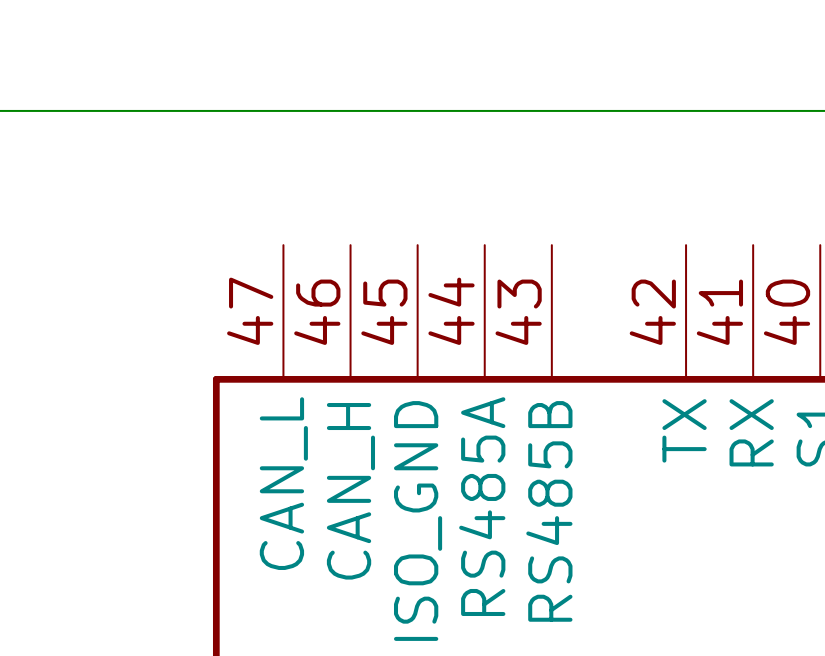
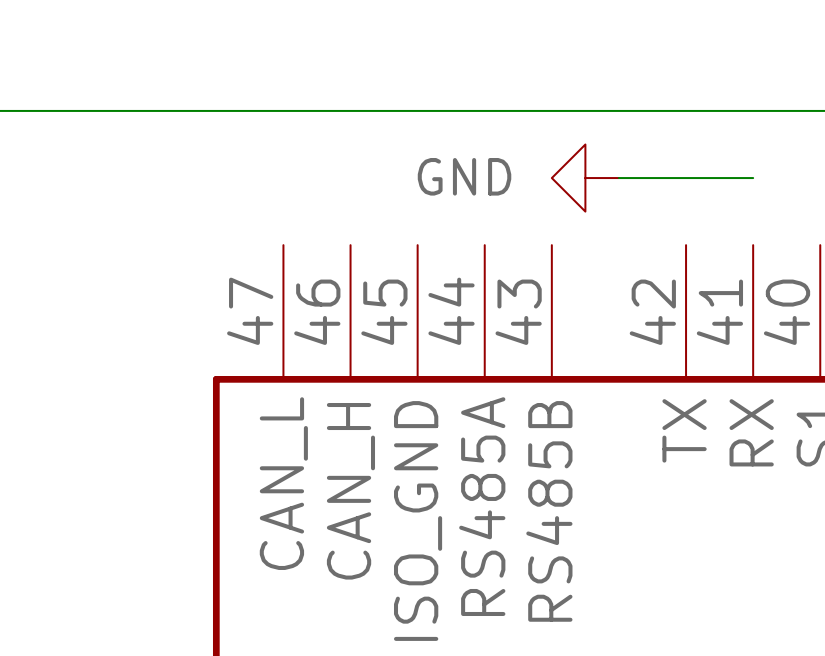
power symbol: none -> GND (585, 178)
wire: none -> (618, 178) (753, 178)

